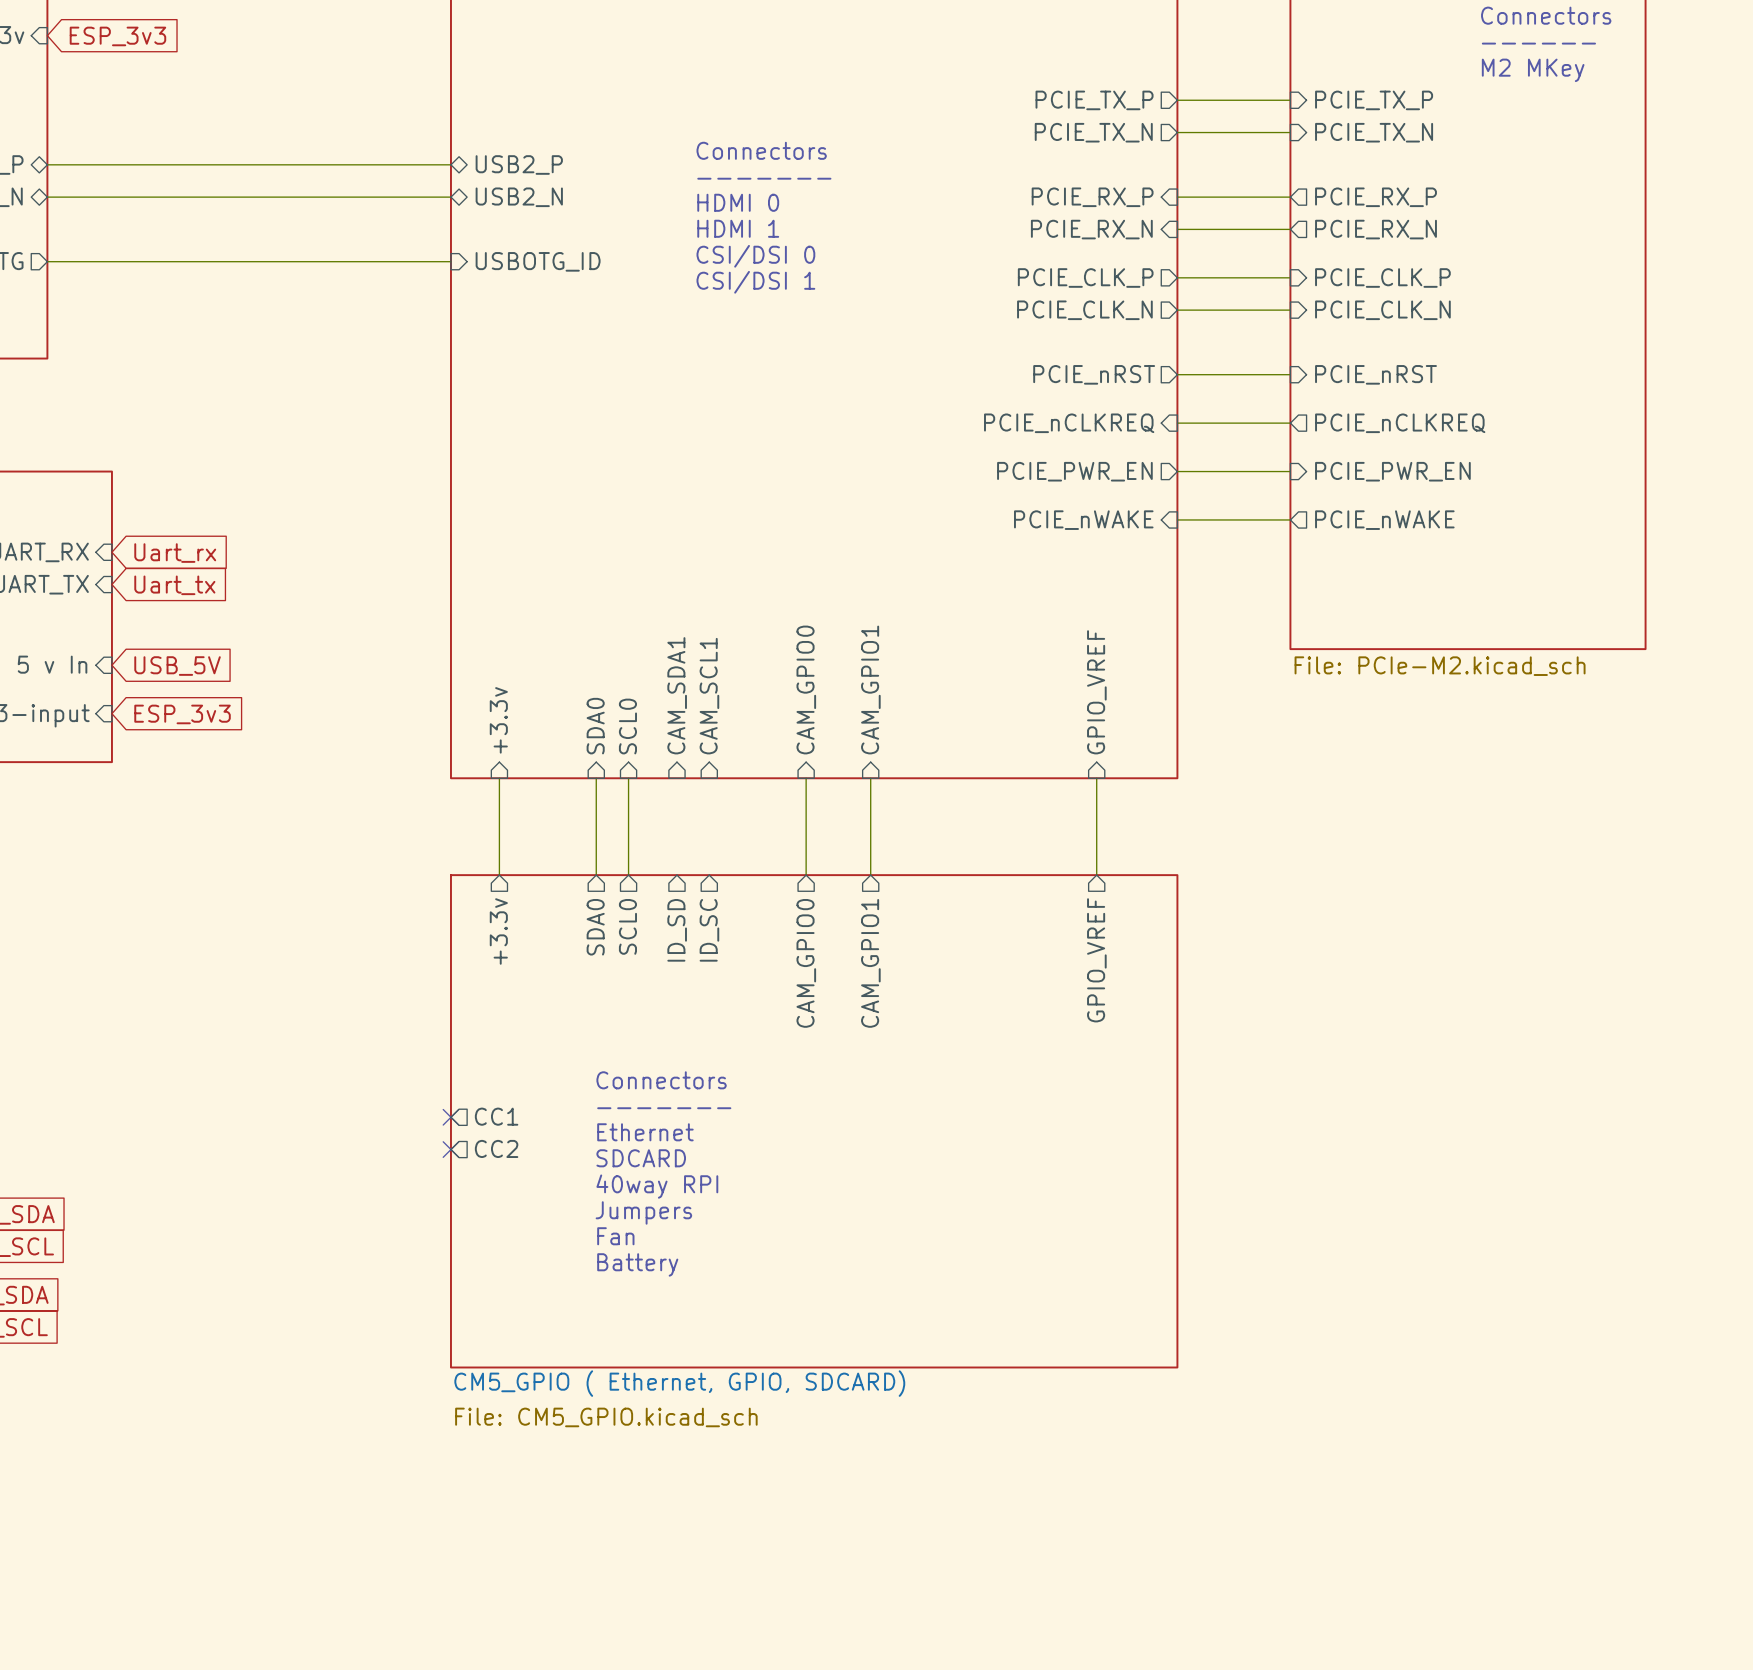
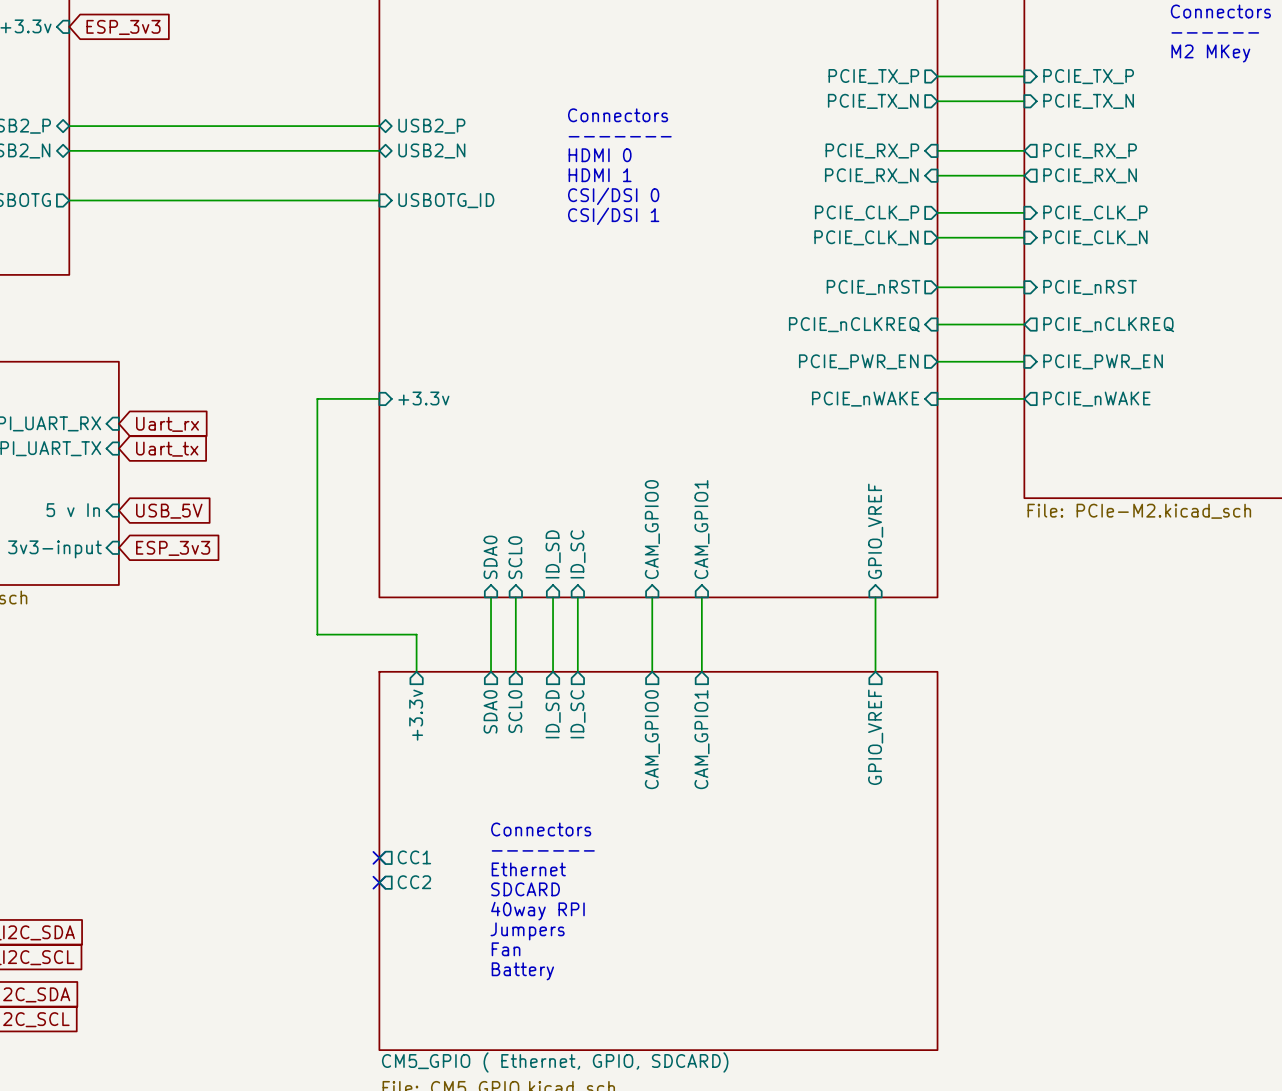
sheet pin: CAM_SDA1 (677, 695) -> ID_SD (553, 554)
sheet pin: CAM_SCL1 (709, 696) -> ID_SC (577, 554)
sheet pin rotation: 0° (498, 720) -> 90° clockwise (423, 398)
sheet pin position: +3.3v (498, 720) -> +3.3v (423, 398)
wire: (499, 778) (499, 826) -> (379, 398) (317, 398) (317, 634) (416, 634)
wire: none -> (553, 597) (553, 671)
wire: none -> (577, 597) (577, 671)

